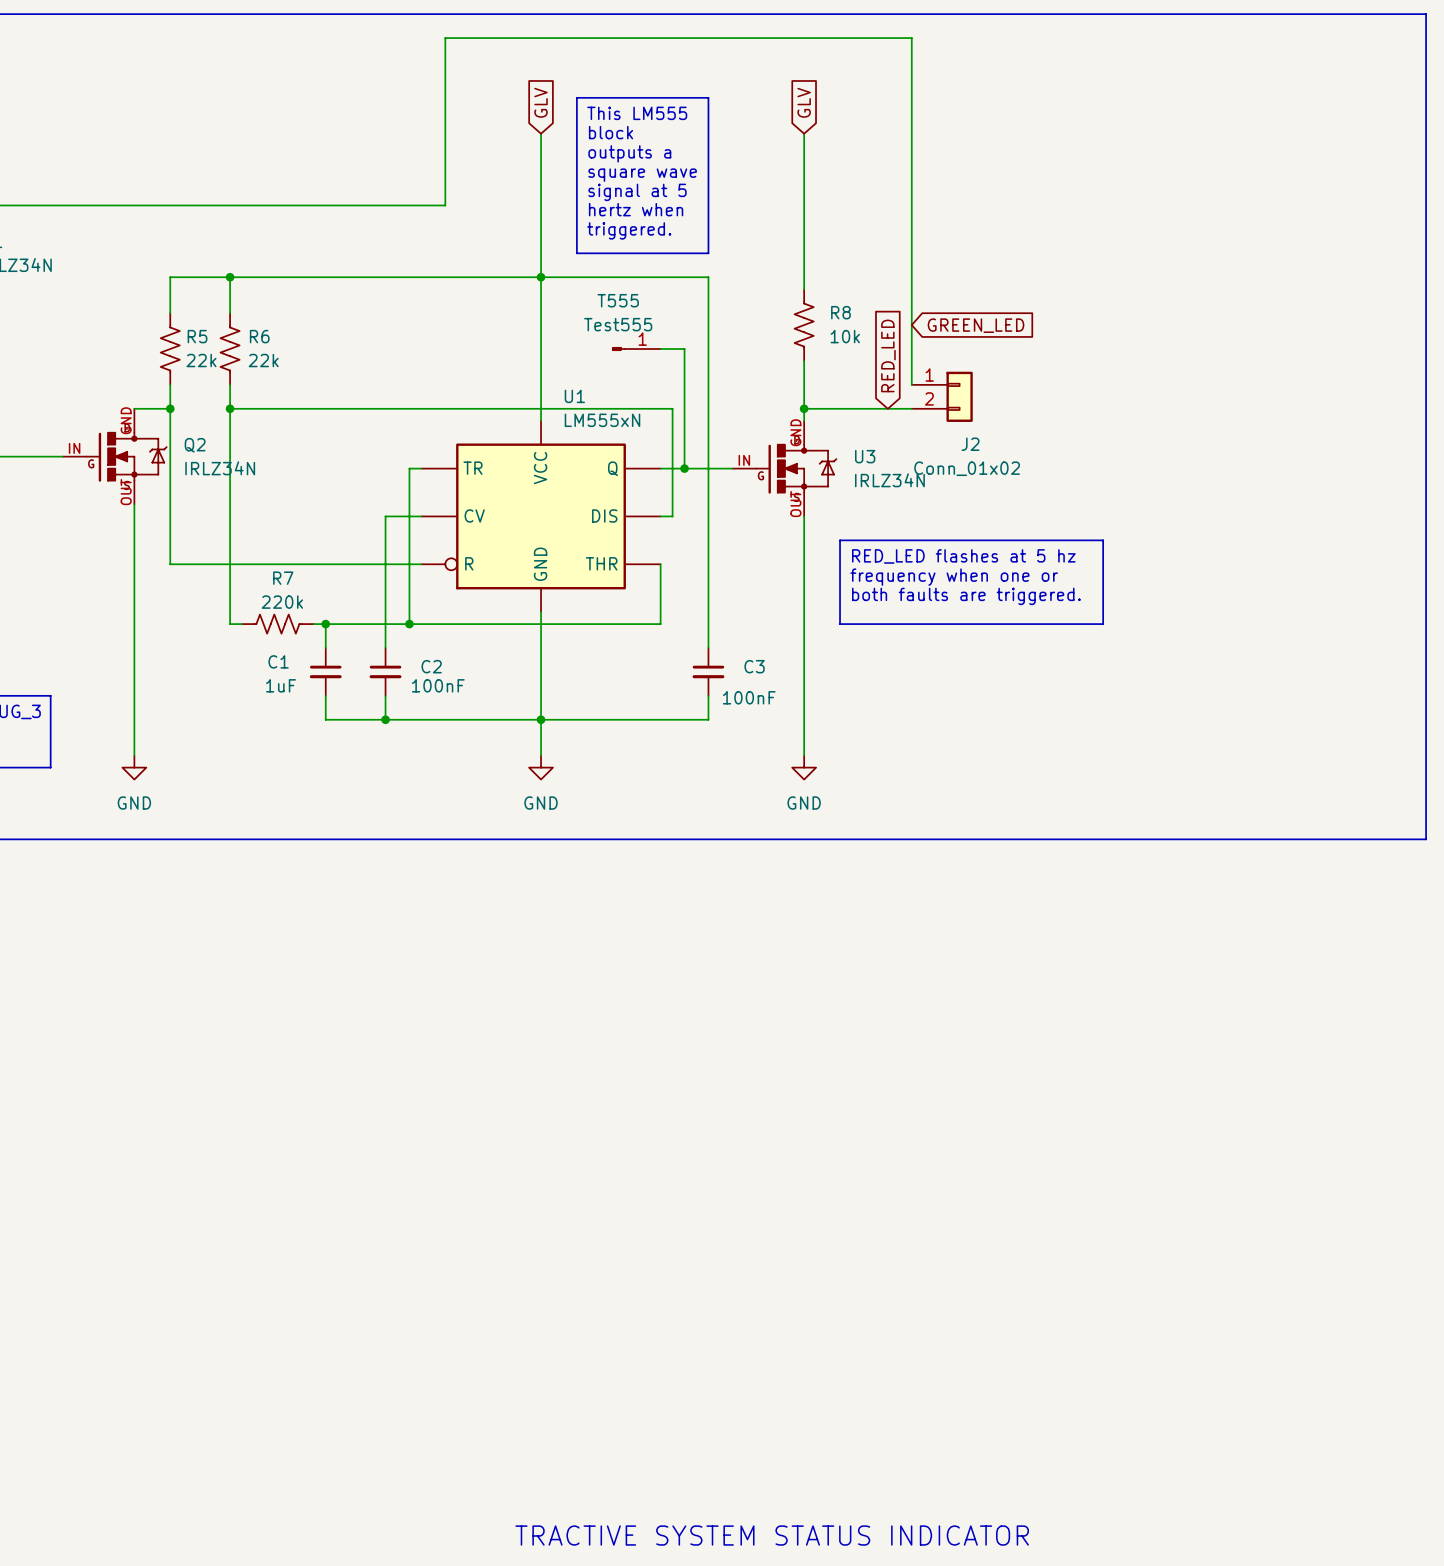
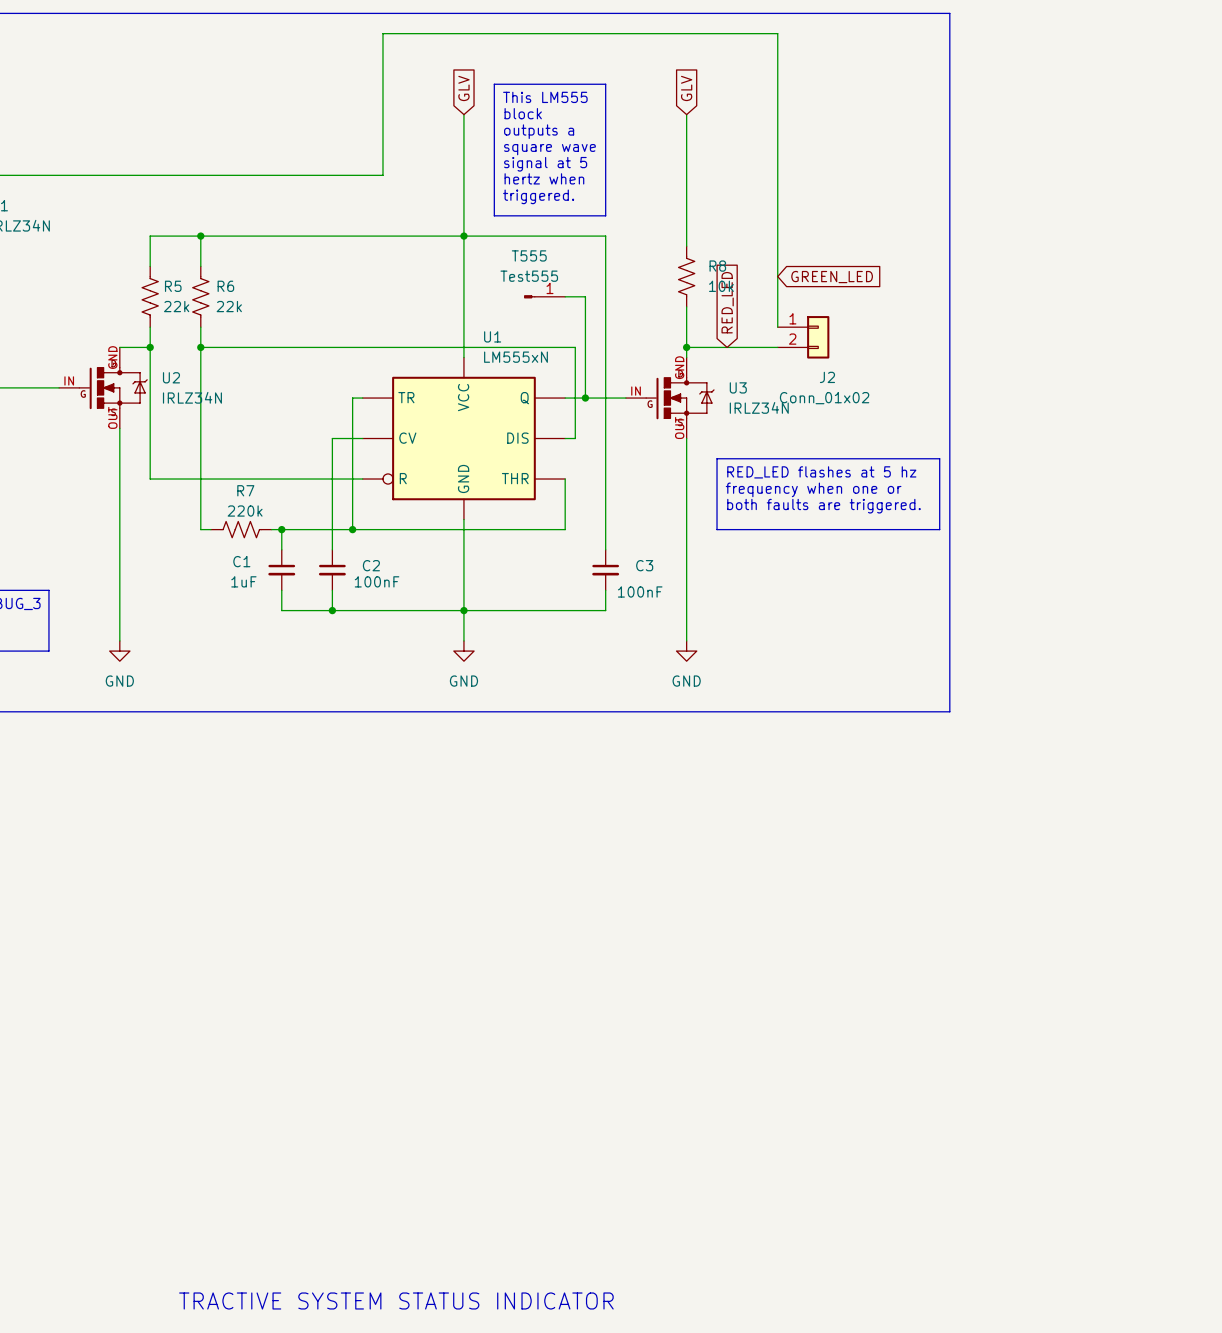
line: (1115, 14) (1426, 14) (1426, 839) (1115, 839) -> (949, 13) (949, 711)
global label position: RED_LED (888, 355) -> RED_LED (727, 302)
Q2 name: Q2 (195, 445) -> U2 (171, 377)
text: none -> TRACTIVE SYSTEM STATUS INDICATOR (396, 1300)
text: TRACTIVE SYSTEM STATUS INDICATOR (772, 1535) -> none

